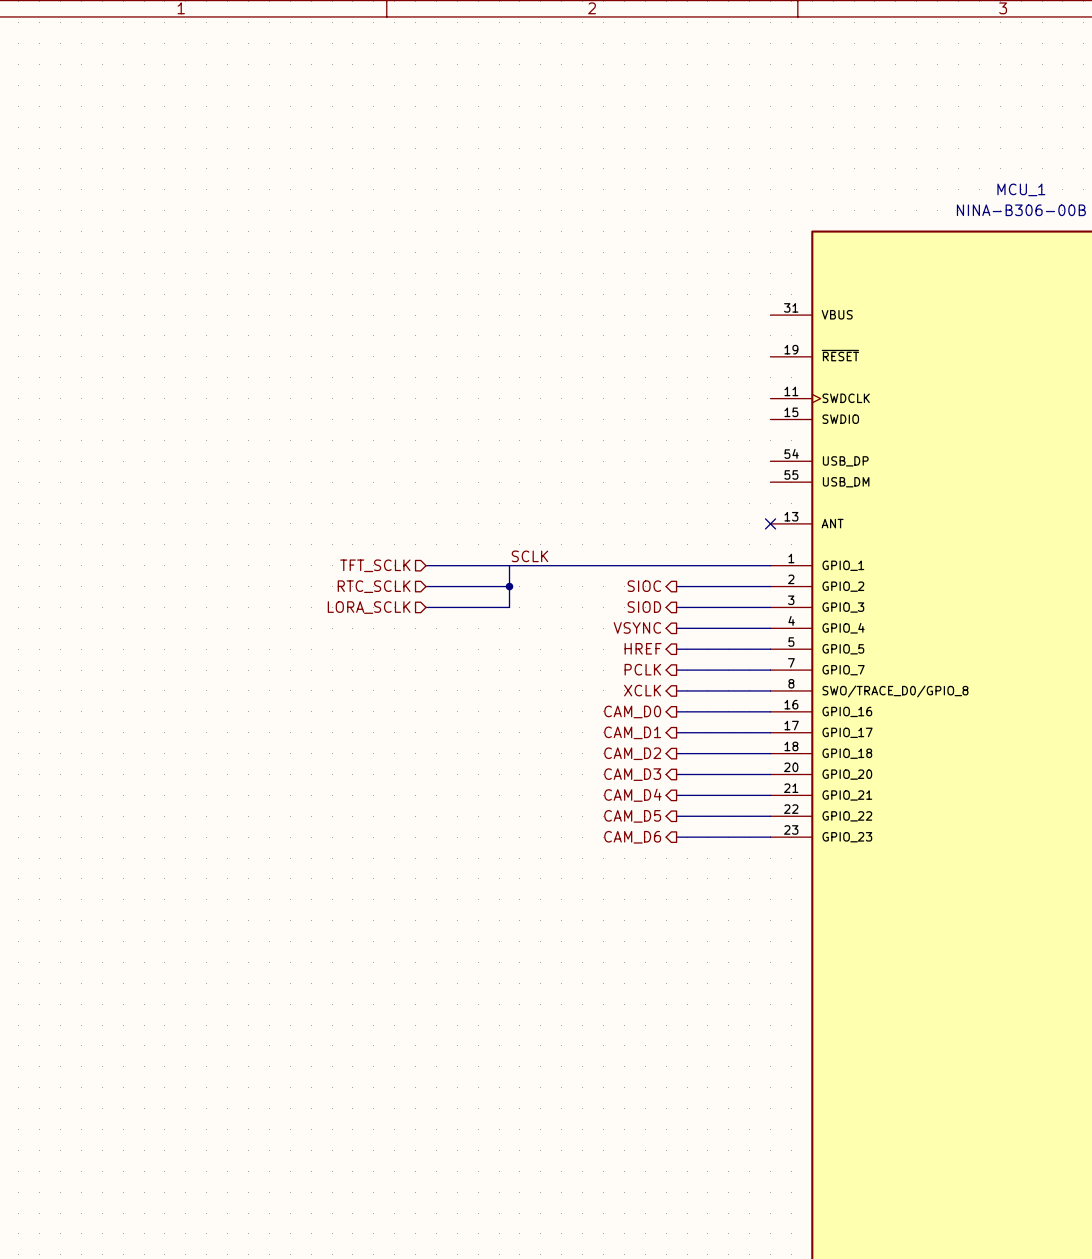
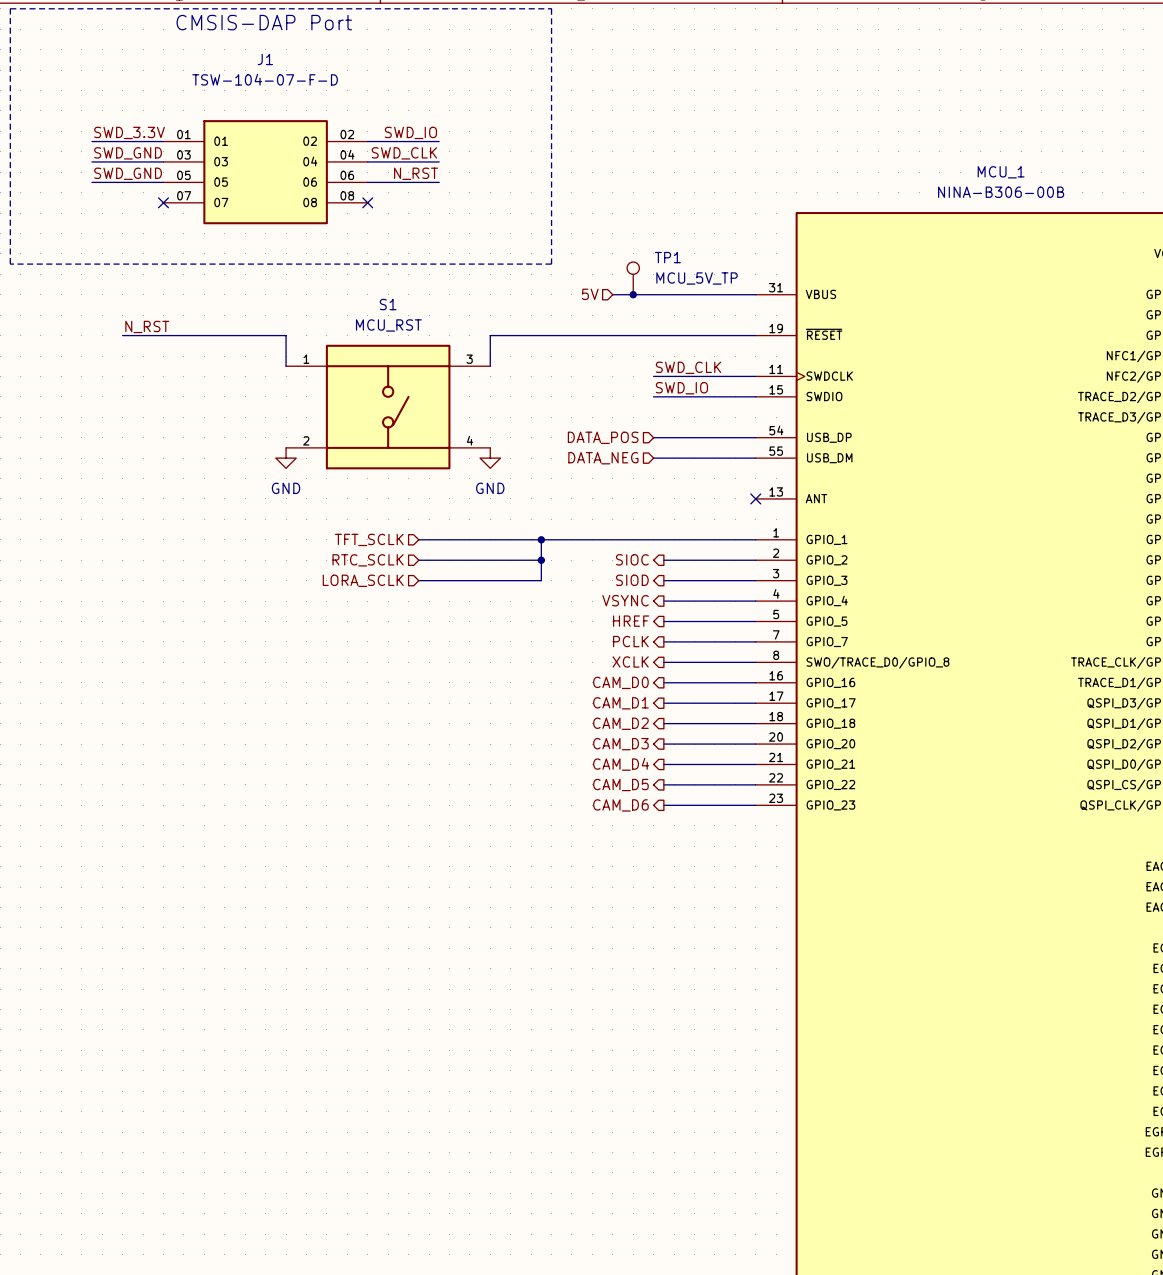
line: none -> (10, 8) (551, 8) (551, 264) (10, 264) (10, 8)
text: none -> CMSIS-DAP Port (264, 22)
label: none -> SWD_3.3V (129, 132)
label: none -> SWD_IO (410, 132)
wire: none -> (92, 141) (163, 141)
wire: none -> (367, 141) (439, 141)
label: none -> SWD_GND (128, 153)
label: none -> SWD_CLK (404, 153)
wire: none -> (92, 161) (163, 161)
wire: none -> (367, 161) (439, 161)
J1: none -> TSW-104-07-F-D (265, 172)
label: none -> SWD_GND (128, 173)
label: none -> N_RST (416, 173)
wire: none -> (92, 182) (163, 182)
wire: none -> (367, 182) (439, 182)
no-connect mark: none -> (163, 202)
no-connect mark: none -> (367, 202)
TP1: none -> MCU_5V_TP (633, 278)
hierarchical label: none -> 5V (590, 294)
wire: none -> (612, 294) (755, 294)
junction: none -> (633, 294)
label: none -> N_RST (147, 326)
wire: none -> (122, 335) (286, 335) (286, 366)
wire: none -> (755, 335) (490, 335) (490, 366)
label: none -> SWD_CLK (688, 367)
wire: none -> (653, 376) (755, 376)
label: none -> SWD_IO (681, 388)
wire: none -> (653, 396) (755, 396)
S1: none -> MCU_RST (388, 407)
hierarchical label: none -> DATA_POS (603, 437)
wire: none -> (653, 437) (755, 437)
power symbol: none -> GND (286, 458)
power symbol: none -> GND (490, 458)
hierarchical label: none -> DATA_NEG (603, 458)
wire: none -> (653, 458) (755, 458)
label: SCLK (529, 556) -> none
wire: (509, 565) (509, 607) -> (541, 539) (541, 580) (500, 580)
bus: (509, 565) (770, 565) -> none
junction: none -> (541, 539)
wire: none -> (500, 560) (541, 560)
junction: (509, 586) -> none
junction: none -> (541, 560)

